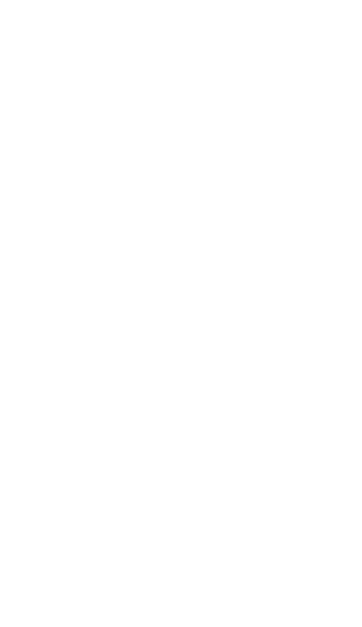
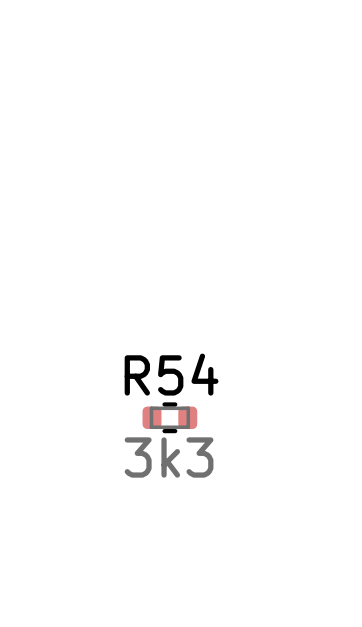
R54: none -> 3k3 (169, 417)

